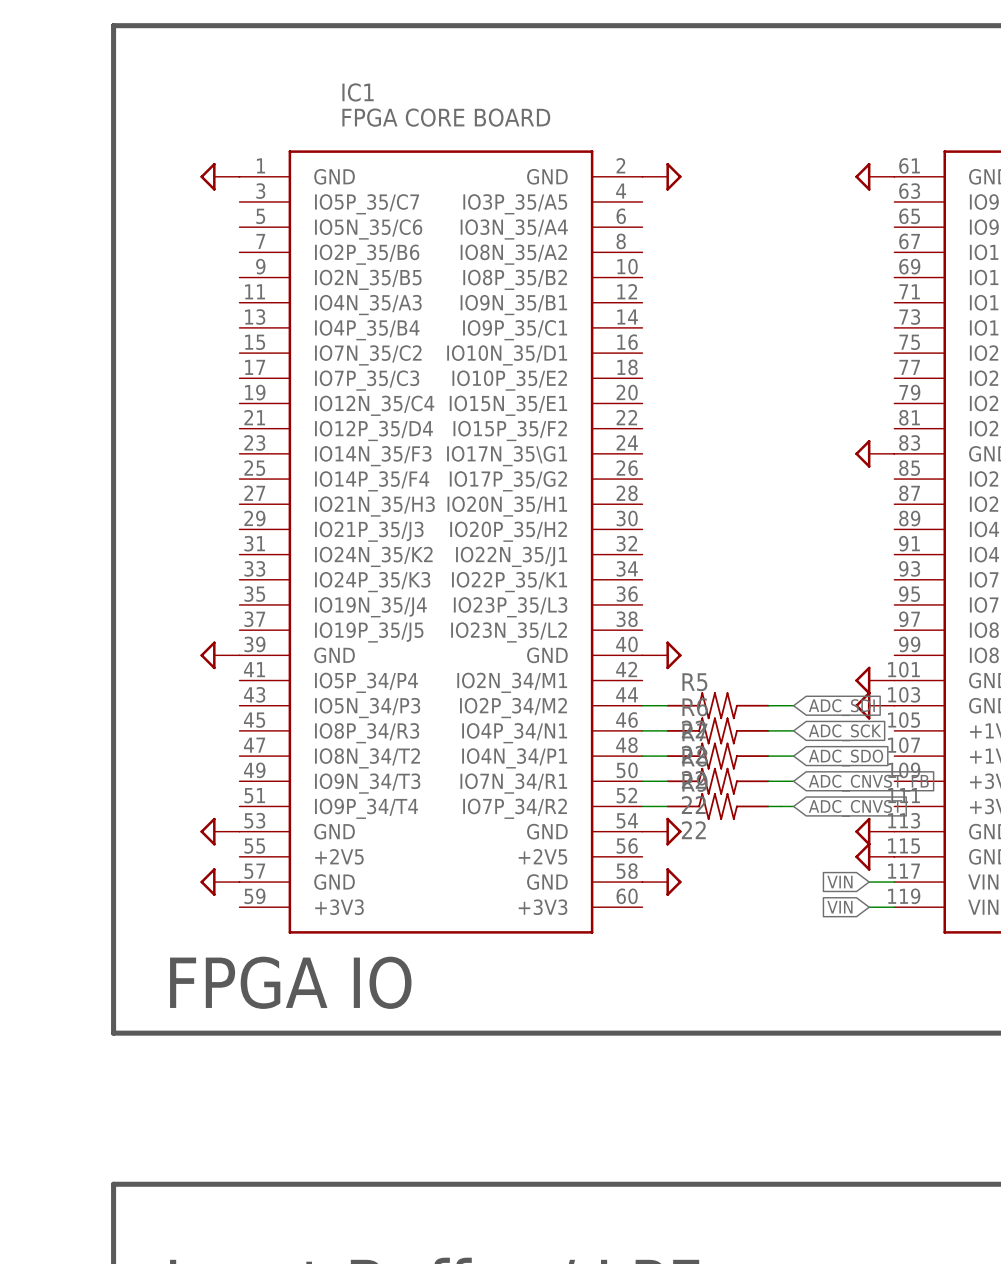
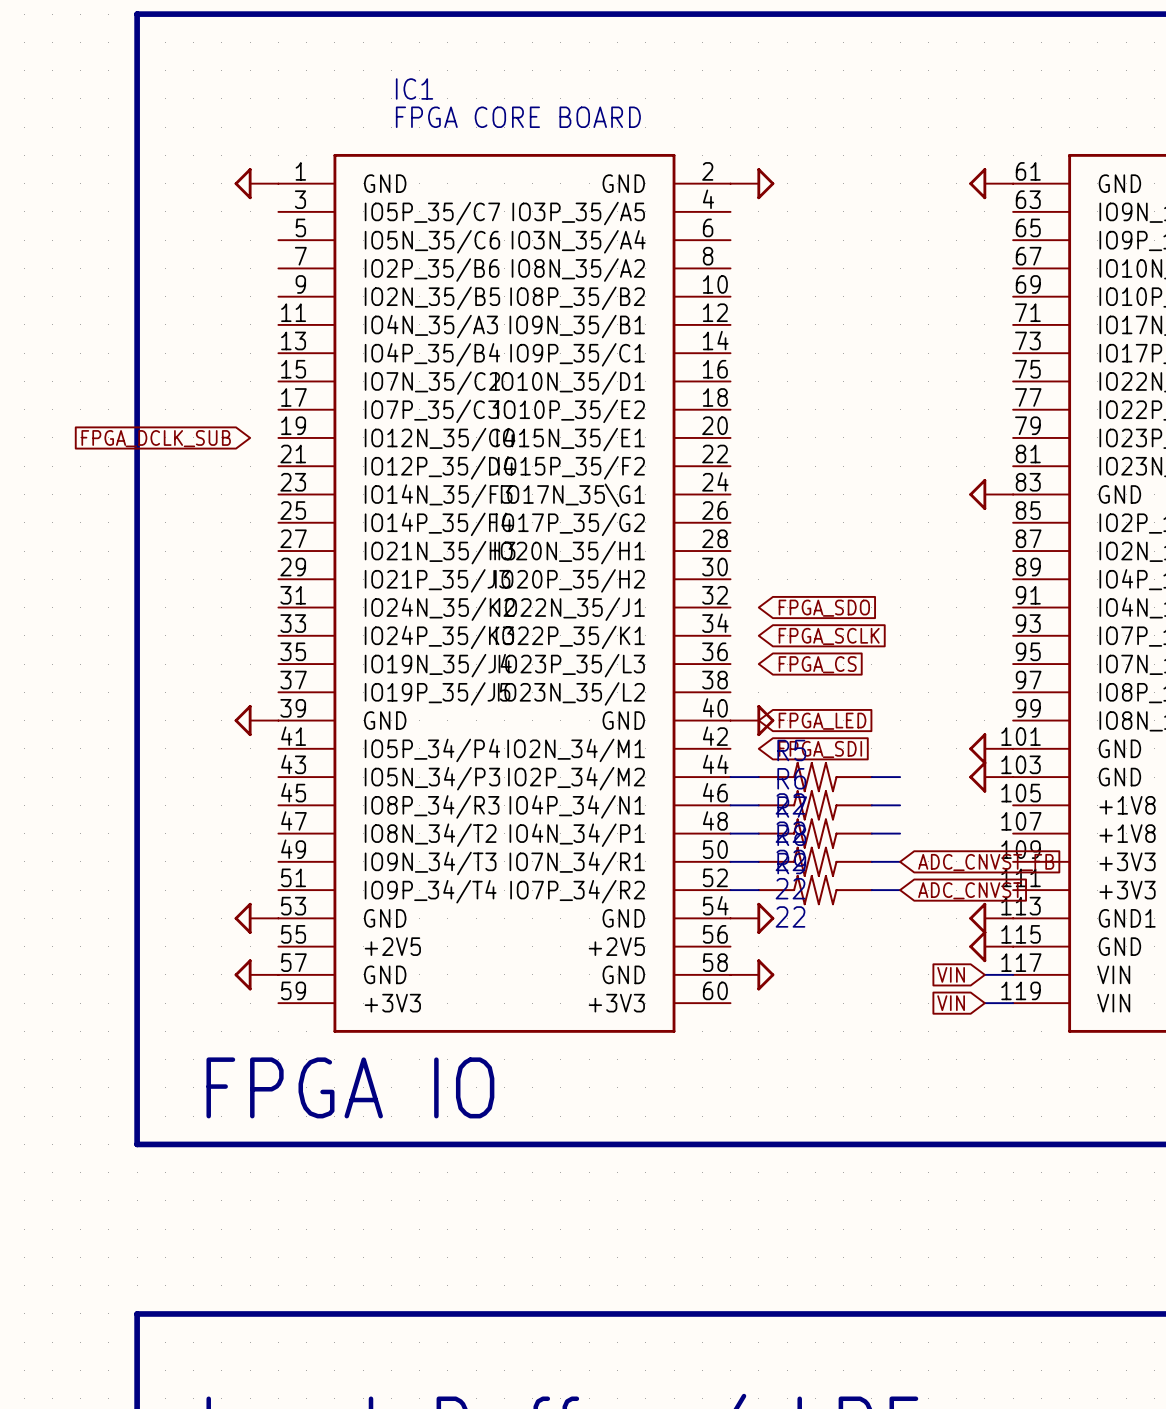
global label: none -> FPGA_DCLK_SUB (156, 438)
global label: none -> FPGA_SDO (824, 608)
global label: none -> FPGA_SCLK (829, 636)
global label: none -> FPGA_CS (817, 664)
global label: none -> FPGA_LED (822, 721)
global label: none -> FPGA_SDI (820, 749)
global label: ADC_SDI (841, 707) -> none
global label: ADC_SCK (845, 732) -> none
global label: ADC_SDO (846, 758) -> none

